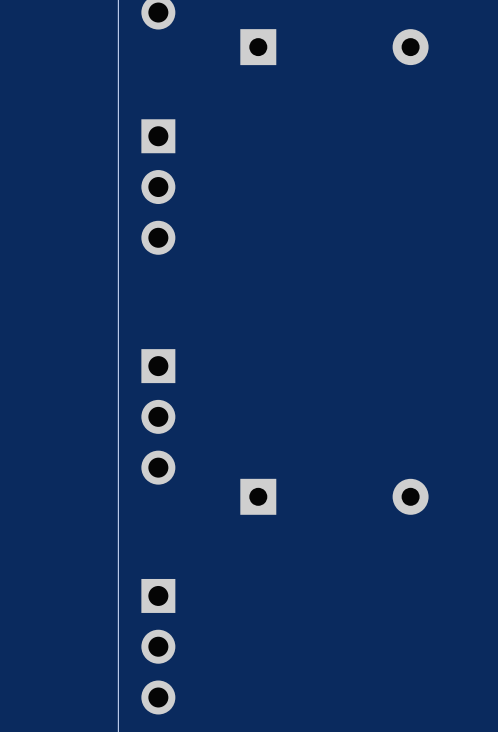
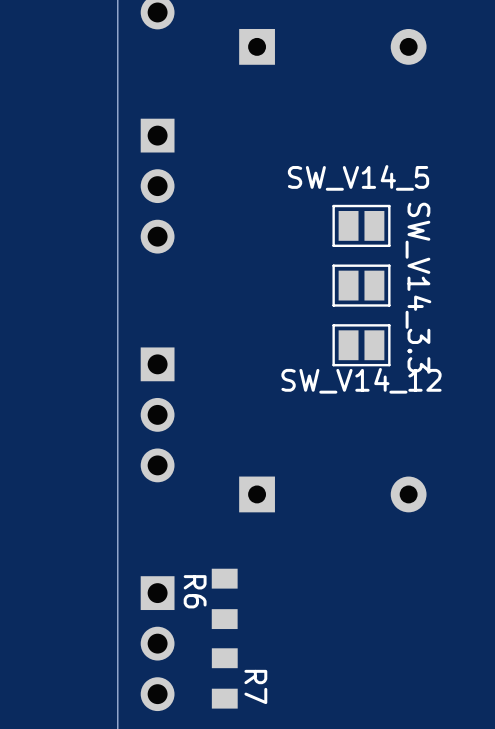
SW_V14_5: none -> (361, 225)
SW_V14_3.3: none -> (361, 285)
SW_V14_12: none -> (361, 345)
R6: none -> (224, 598)
R7: none -> (224, 678)

